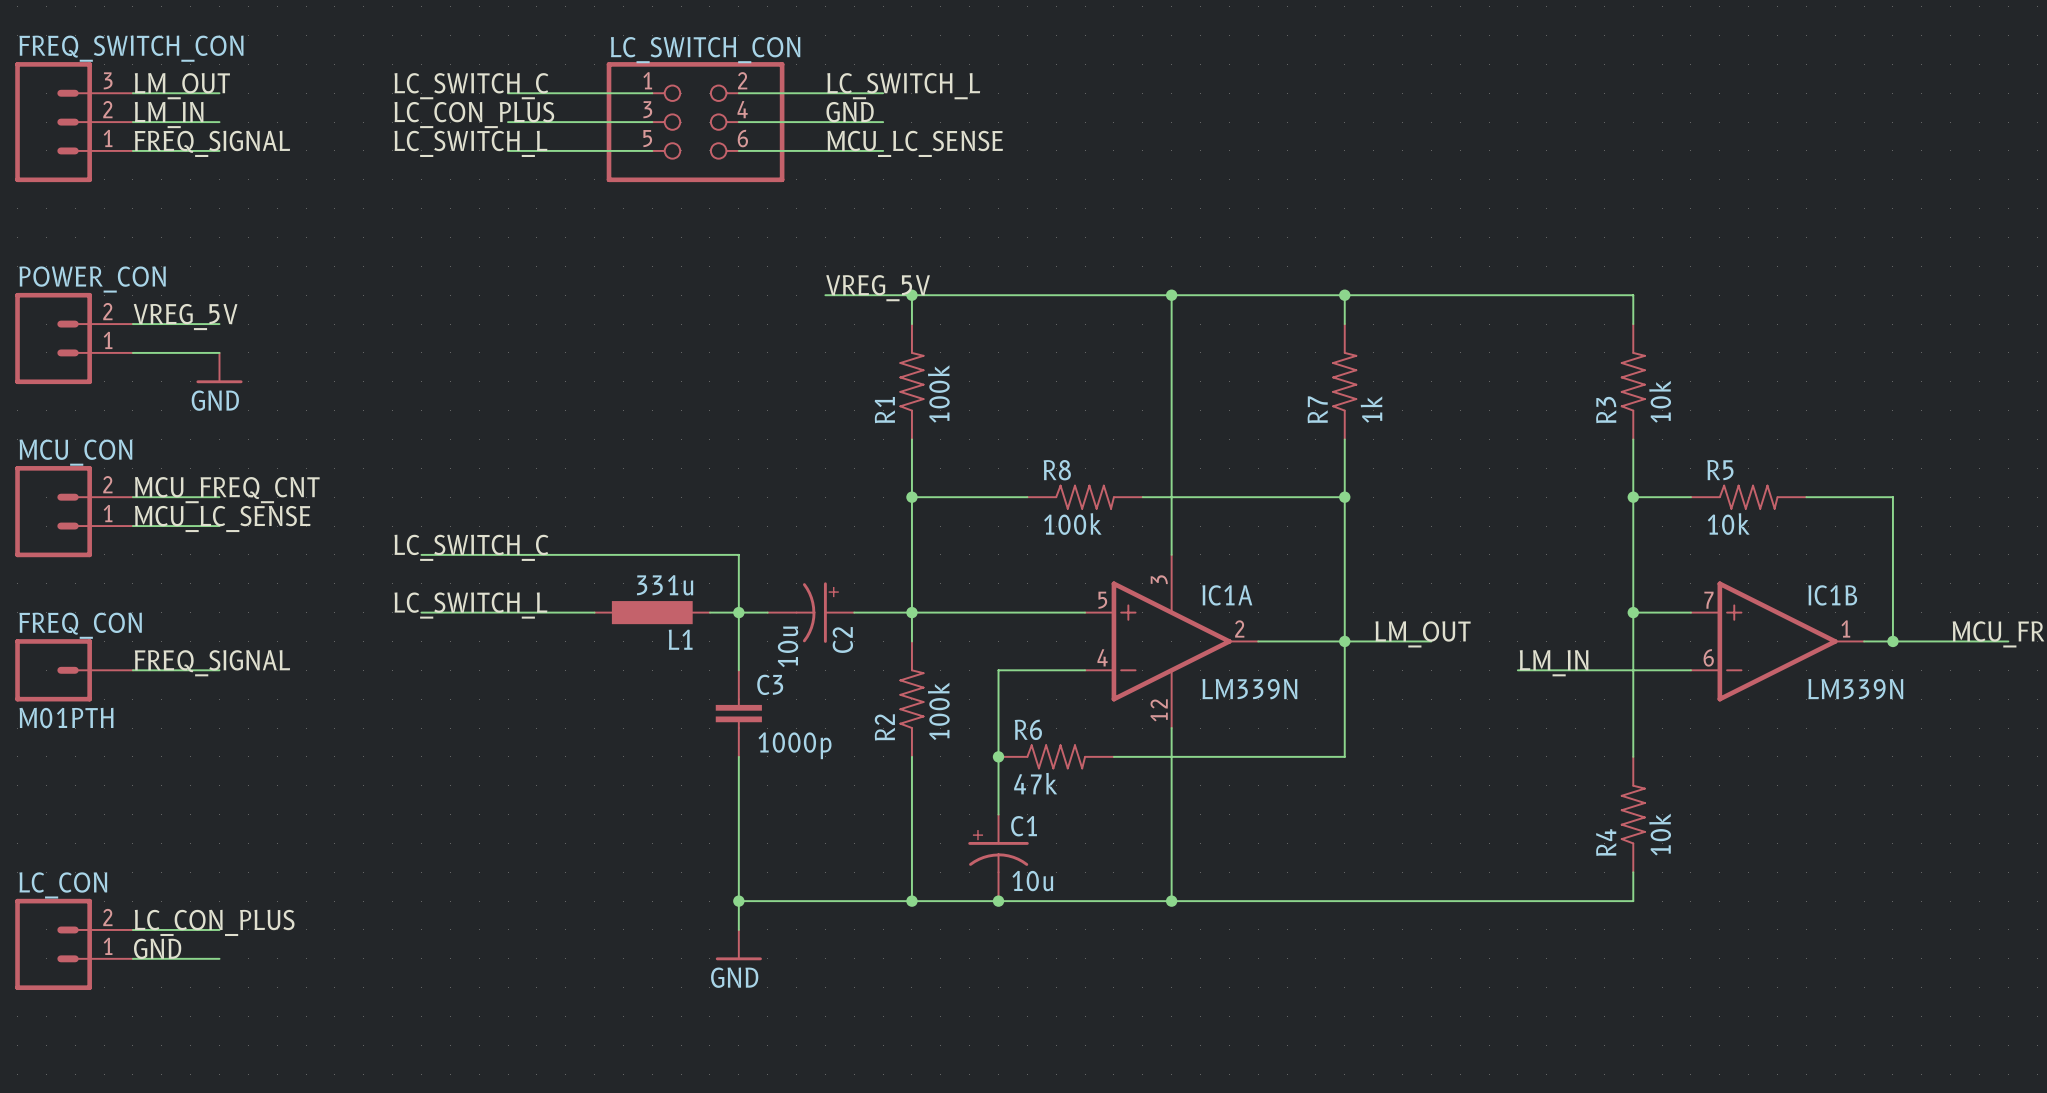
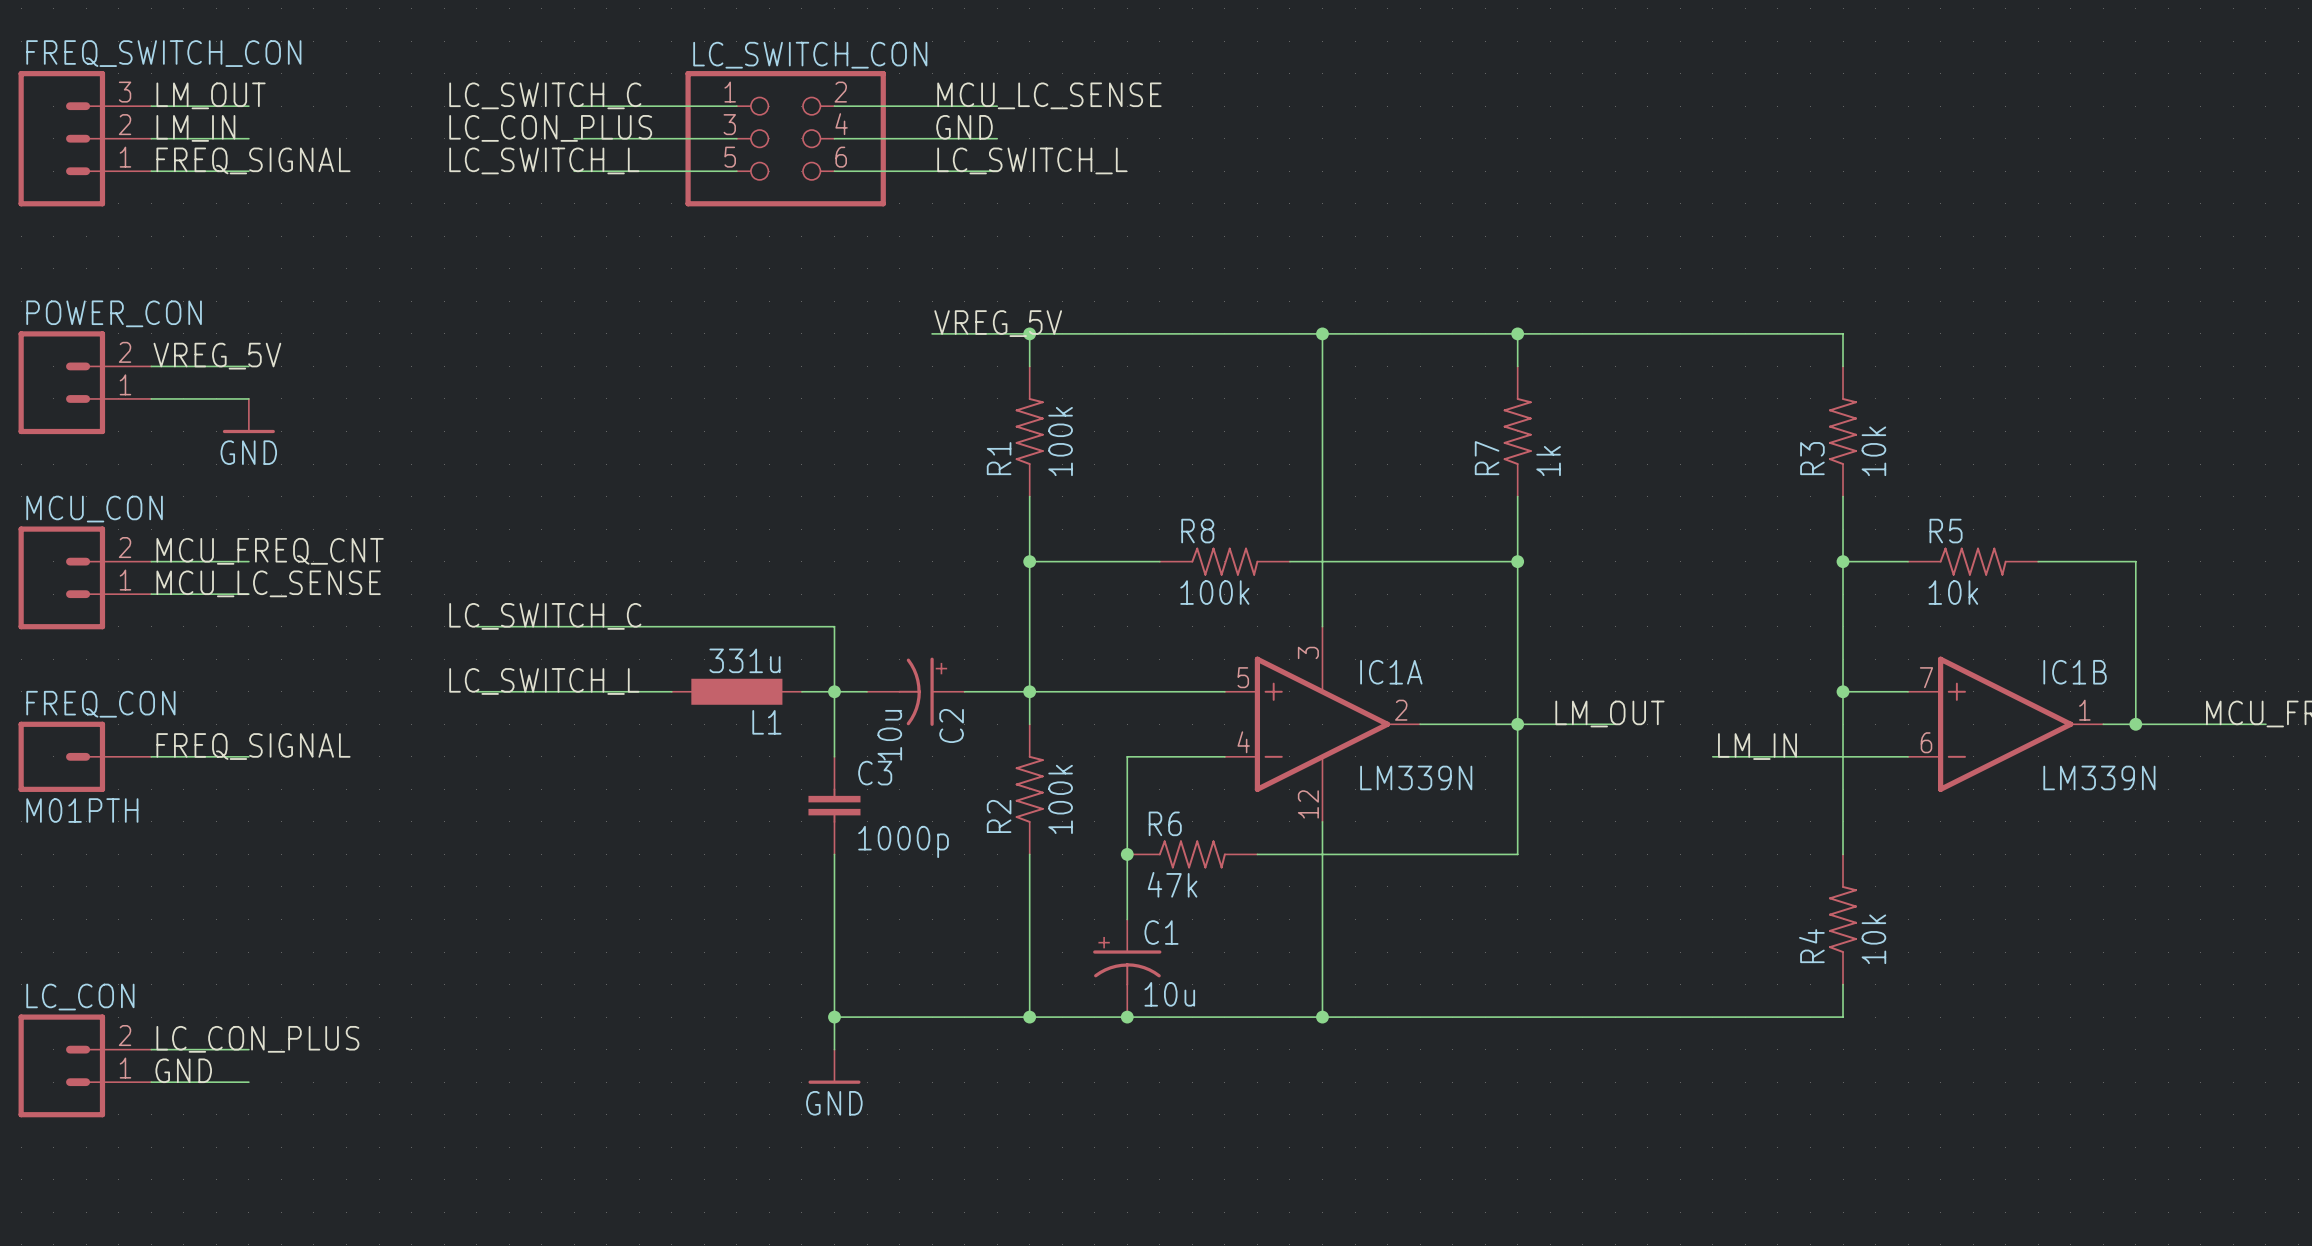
label: LC_SWITCH_L (903, 86) -> MCU_LC_SENSE (1049, 95)
label: MCU_LC_SENSE (915, 143) -> LC_SWITCH_L (1032, 160)

